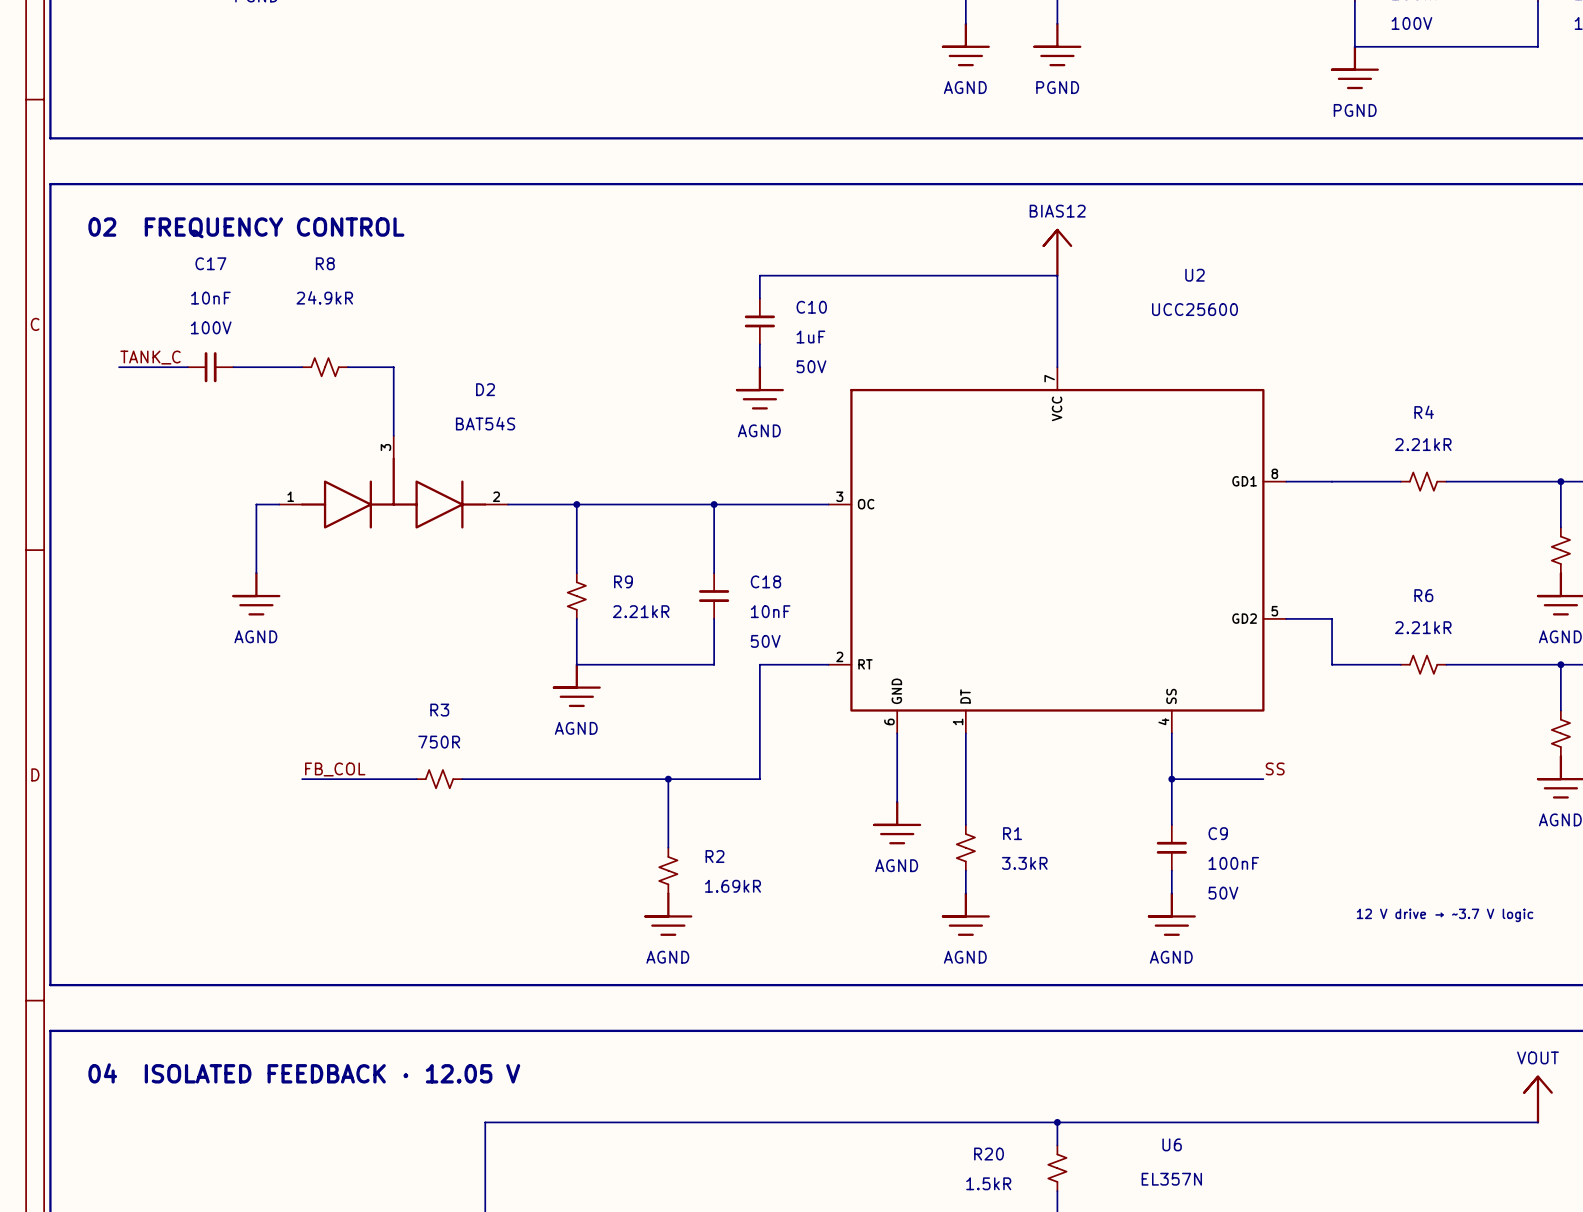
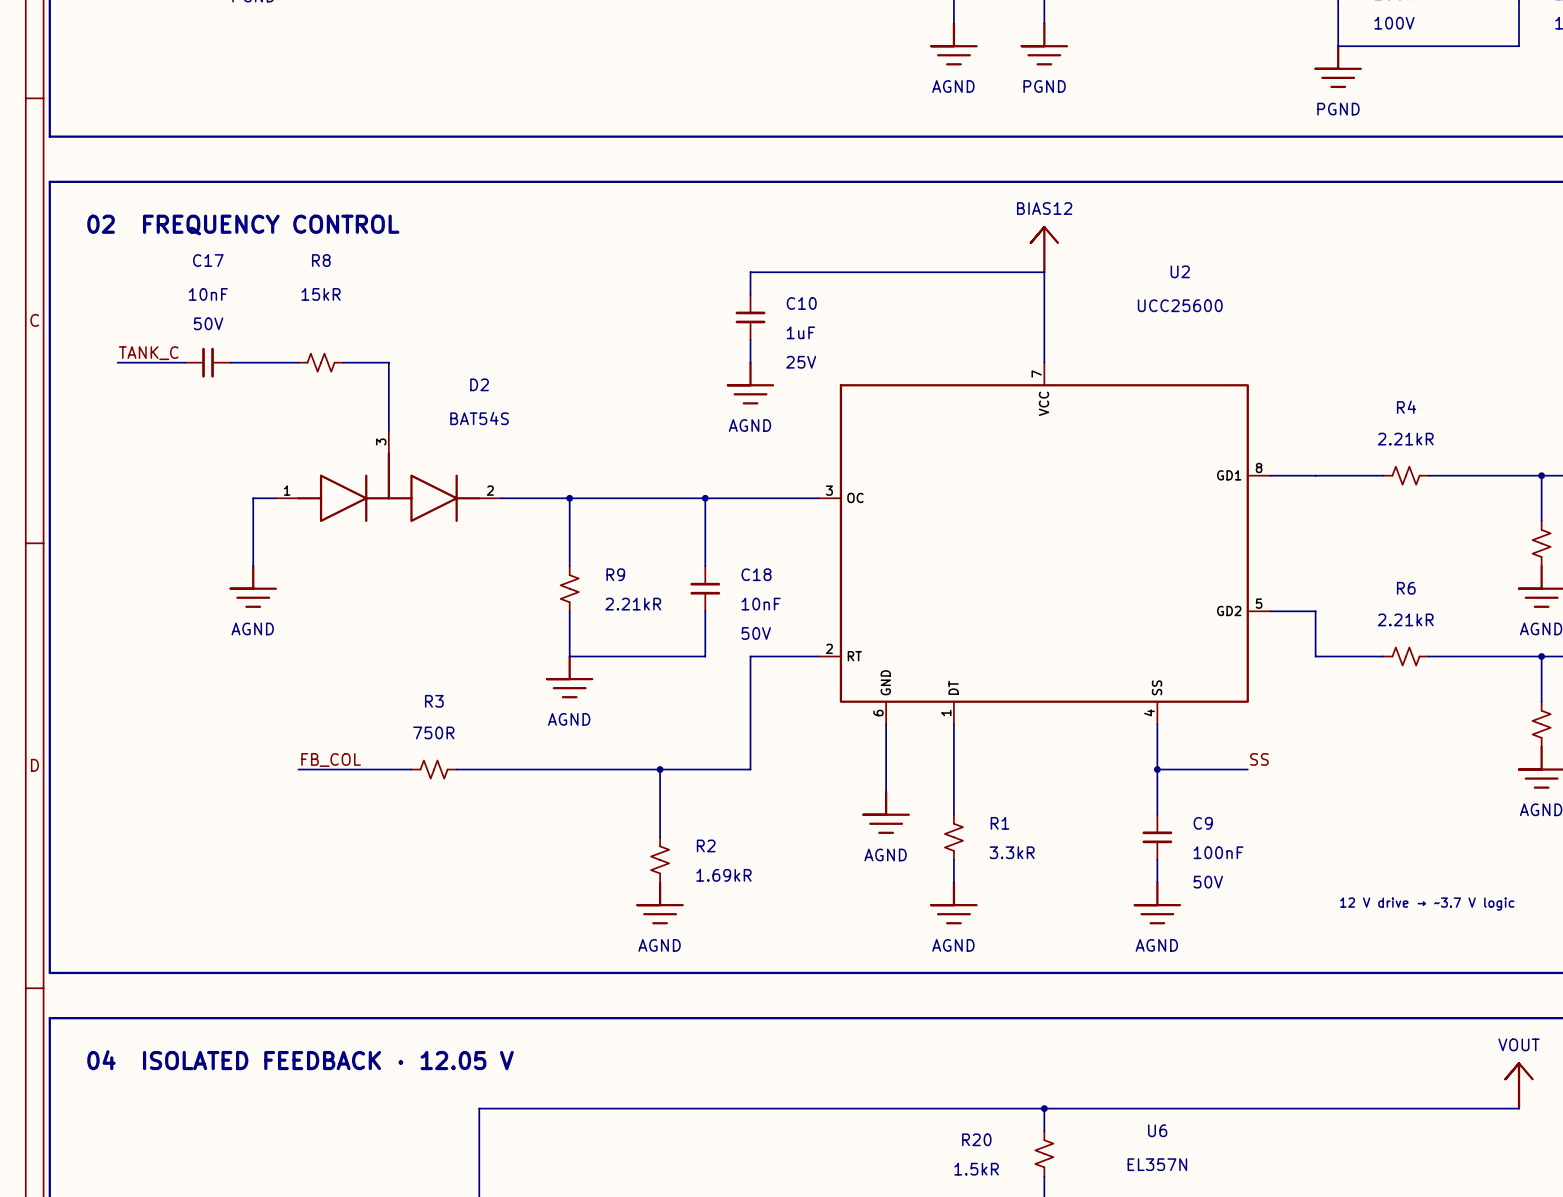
R8 value: 24.9kR (324, 297) -> 15kR (321, 294)
C17 text: 100V (211, 327) -> 50V (208, 323)
C10 text: 50V (811, 366) -> 25V (801, 362)

